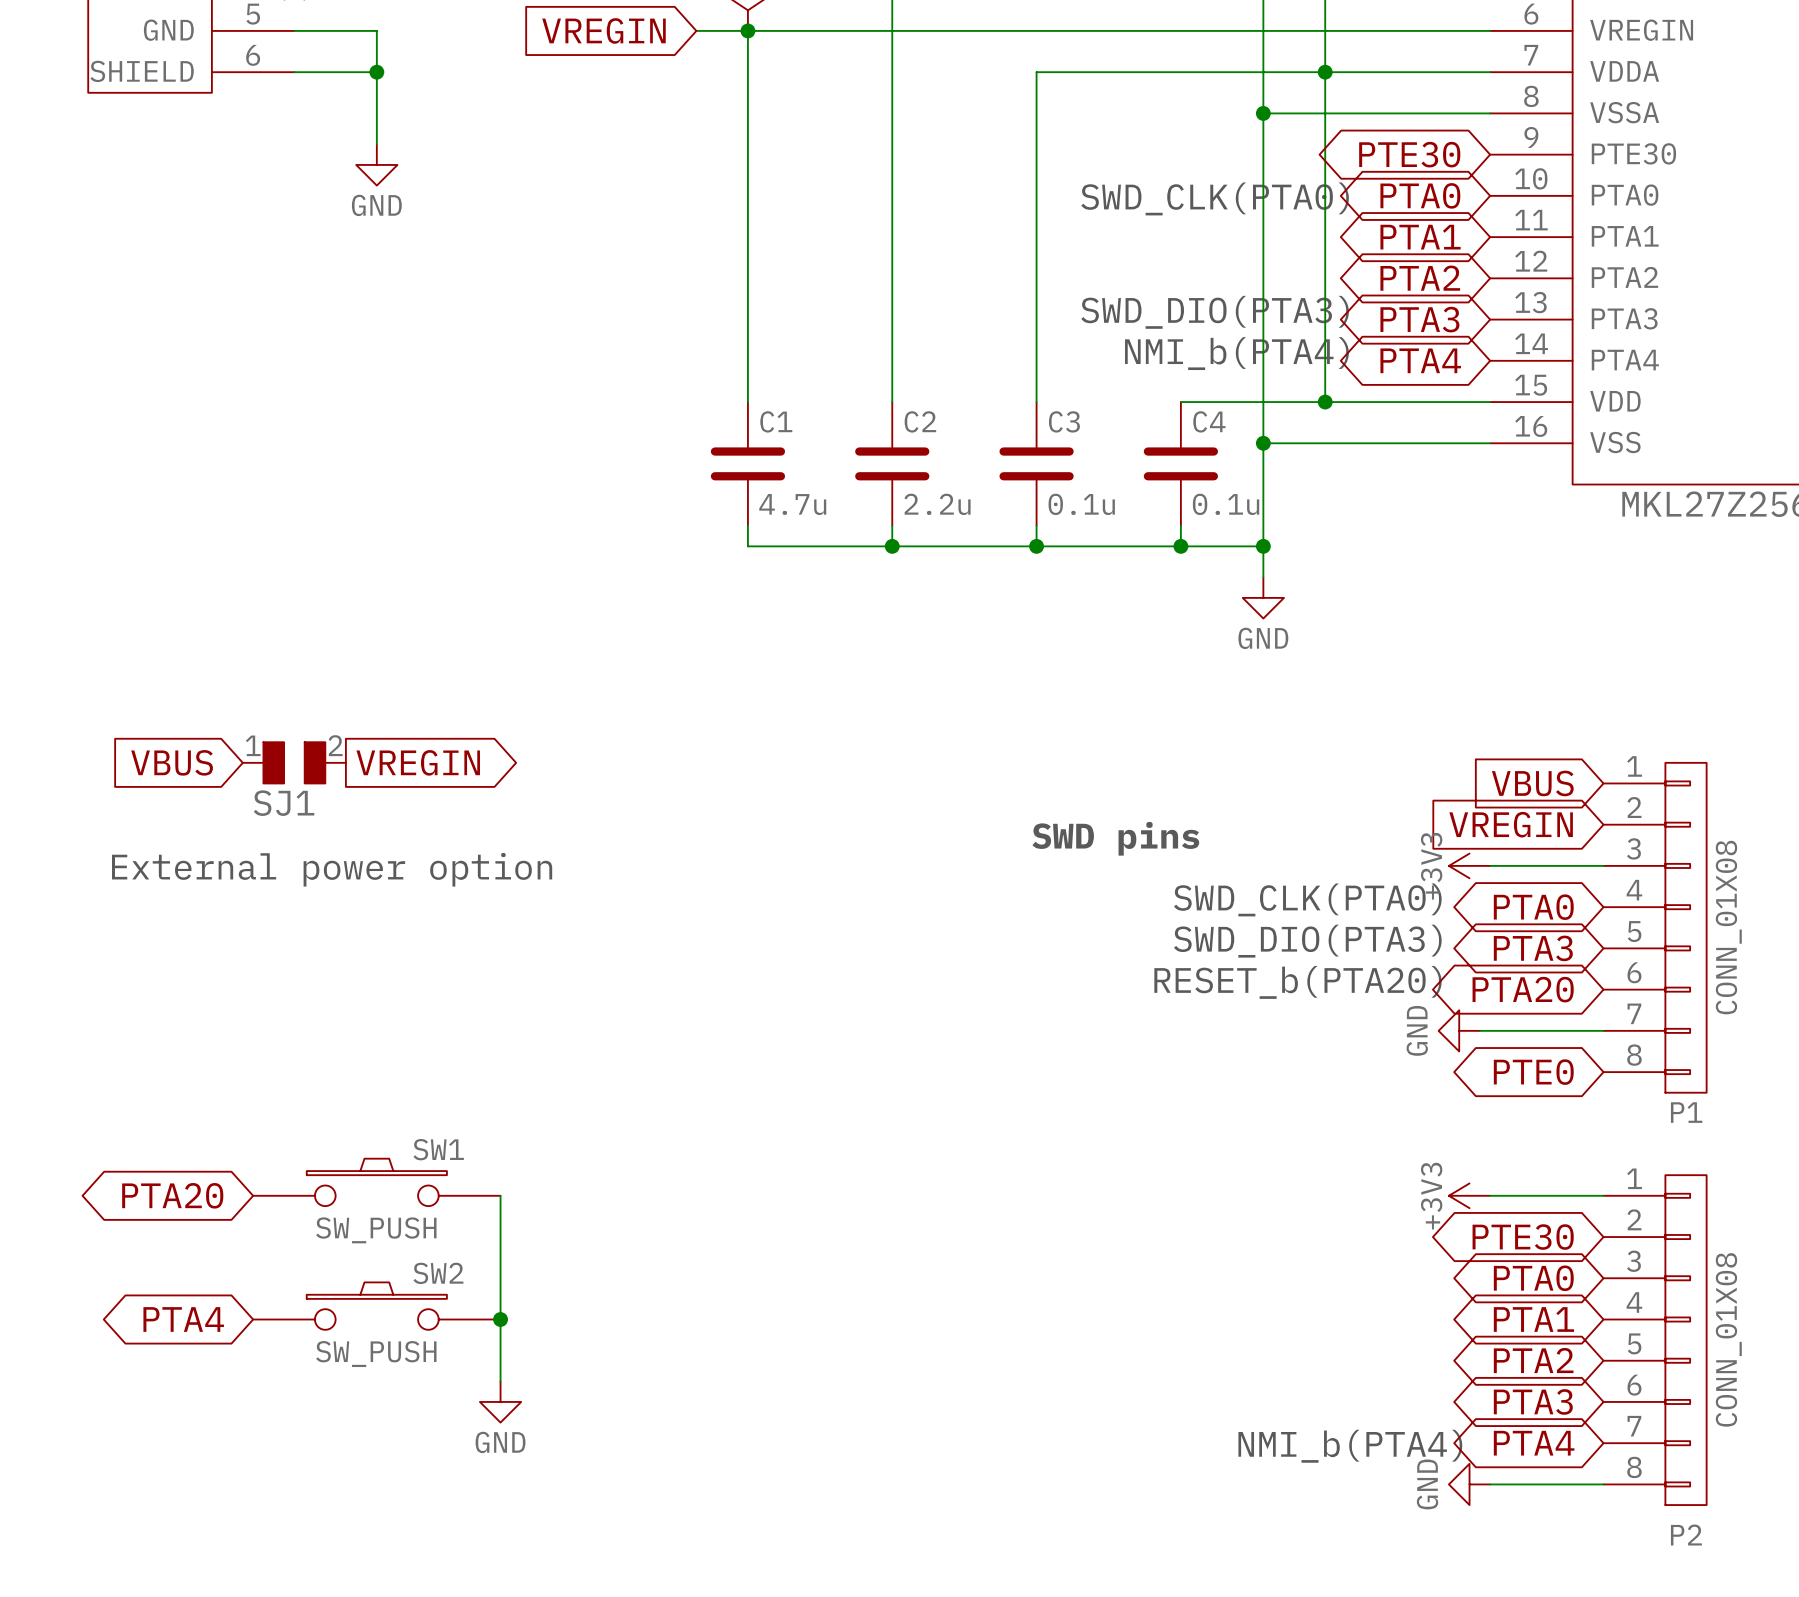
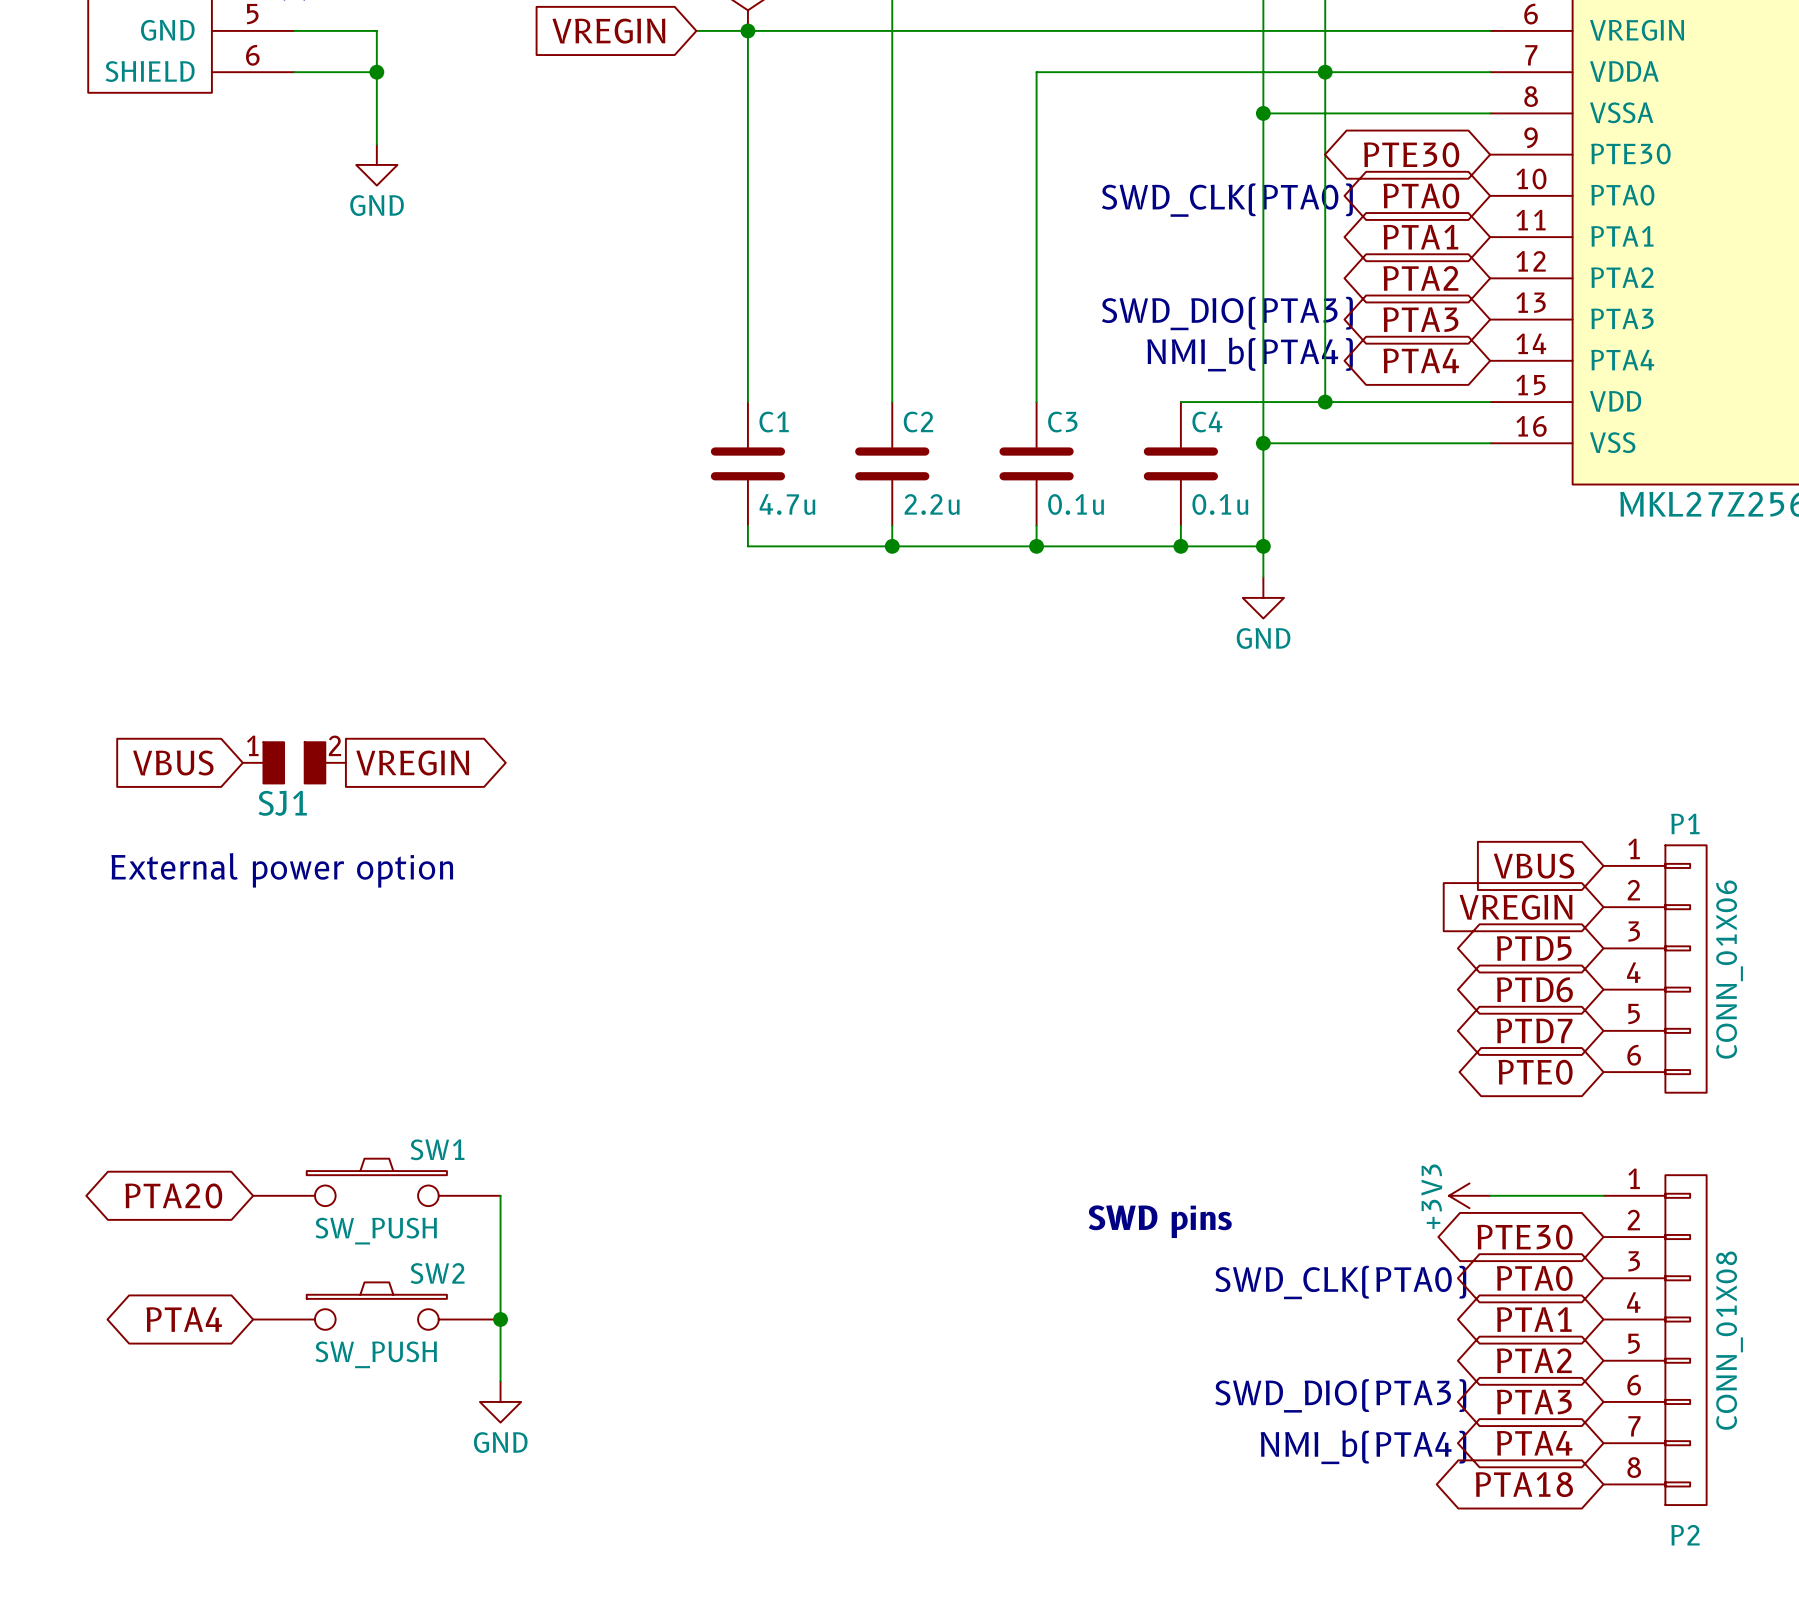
P1 symbol: [1603, 762, 1707, 1093] -> [1603, 845, 1707, 1093]
global label position: VBUS (1532, 783) -> VBUS (1534, 866)
global label: VREGIN (1511, 824) -> none
text position: SWD pins (1115, 838) -> SWD pins (1160, 1221)
power symbol: +3V3 (1469, 865) -> none
wire: (1490, 865) (1603, 865) -> none
text position: SWD_CLK(PTA0) (1307, 899) -> SWD_CLK(PTA0) (1340, 1282)
global label shape: bidirectional (1533, 907) -> input (1515, 907)
global label: PTA0 (1533, 907) -> VREGIN (1515, 907)
P1 value: CONN_01X08 (1728, 927) -> CONN_01X06 (1729, 969)
text: SWD_DIO(PTA3) (1307, 941) -> none
global label: PTA3 (1533, 948) -> PTD5 (1534, 948)
text: RESET_b(PTA20) (1298, 982) -> none
global label: PTA20 (1523, 989) -> PTD6 (1534, 989)
power symbol: GND (1459, 1030) -> none
wire: (1479, 1030) (1603, 1030) -> none
global label: none -> PTD7 (1534, 1030)
P1 name position: P1 (1686, 1112) -> P1 (1685, 823)
text: none -> SWD_DIO(PTA3) (1340, 1395)
power symbol: GND (1469, 1484) -> none
wire: (1490, 1484) (1603, 1484) -> none
global label: none -> PTA18 (1524, 1484)

